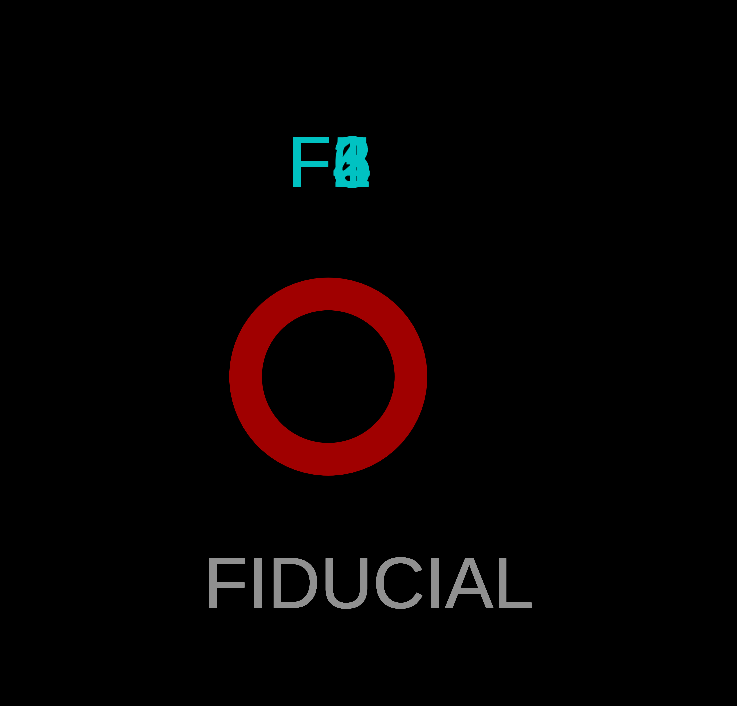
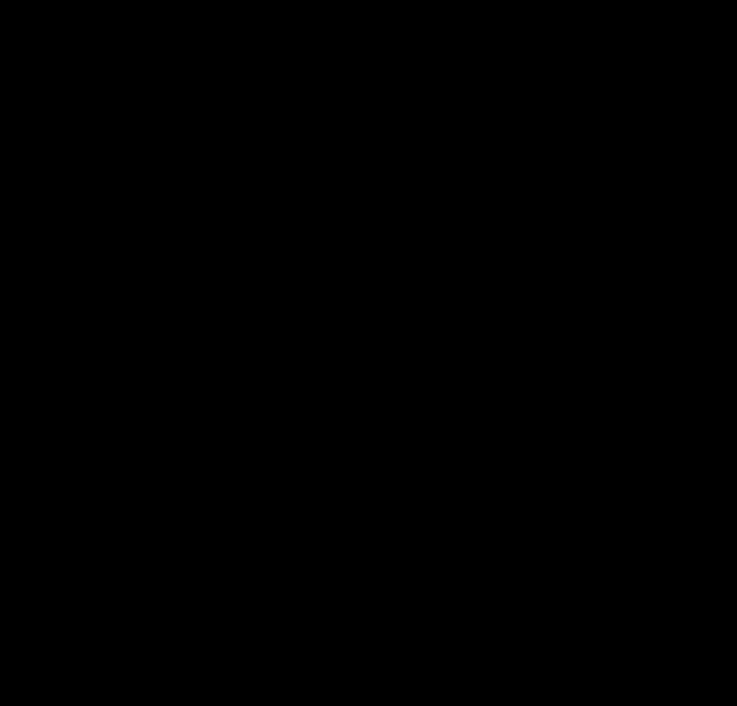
part: FIDUCIAL (370, 372) -> none
part: FIDUCIAL (370, 372) -> none
part: FIDUCIAL (370, 372) -> none
part: FIDUCIAL (328, 376) -> none
part: FIDUCIAL (328, 376) -> none
part: FIDUCIAL (328, 376) -> none

